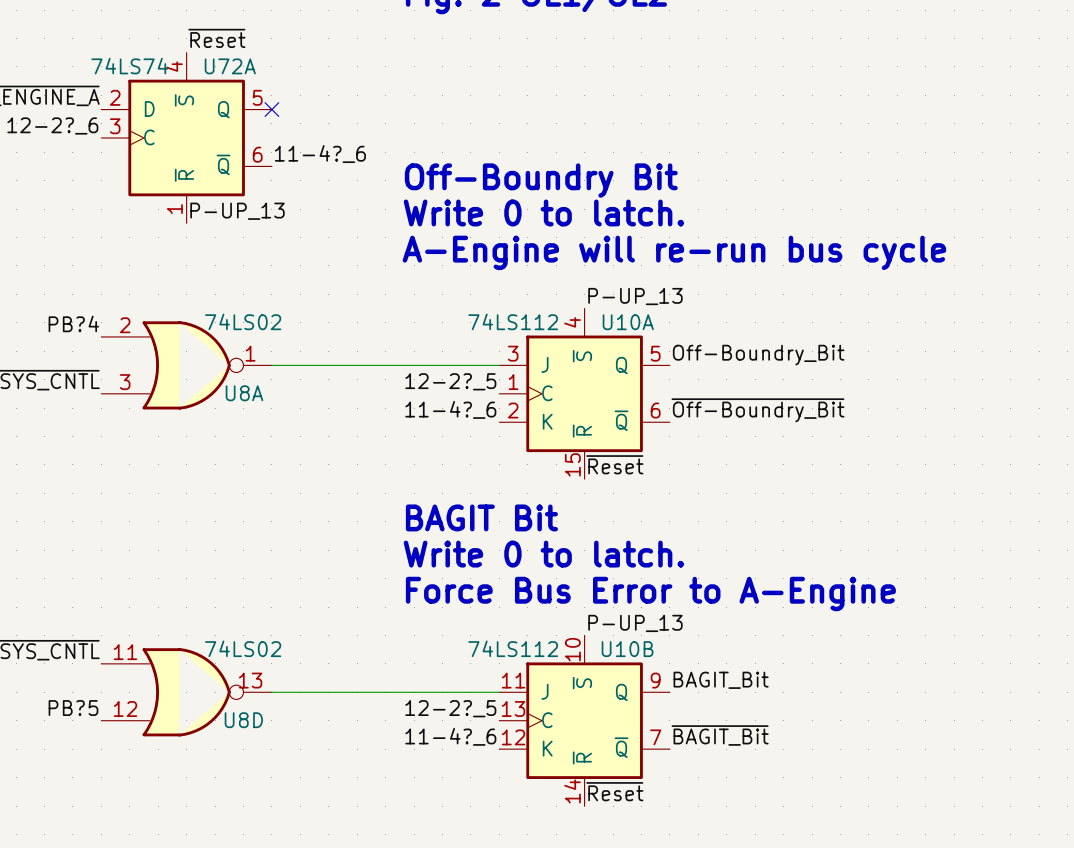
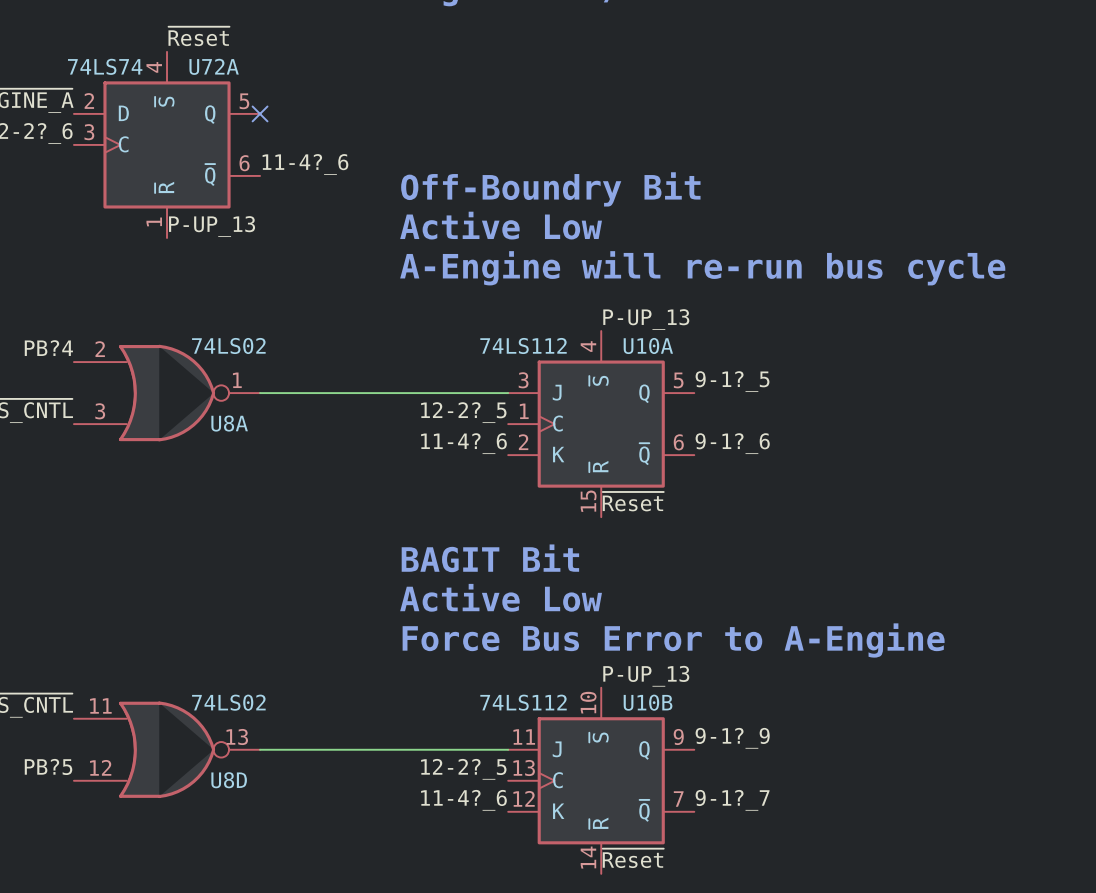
text: Write 0 to latch. (543, 212) -> Active Low (501, 225)
label: Off-Boundry_Bit (758, 355) -> 9-1?_5 (732, 381)
label: ~{Off-Boundry_Bit} (758, 410) -> 9-1?_6 (732, 443)
text: Write 0 to latch. (543, 554) -> Active Low (501, 597)
label: BAGIT_Bit (721, 680) -> 9-1?_9 (732, 738)
label: ~{BAGIT_Bit} (720, 735) -> 9-1?_7 (732, 800)

